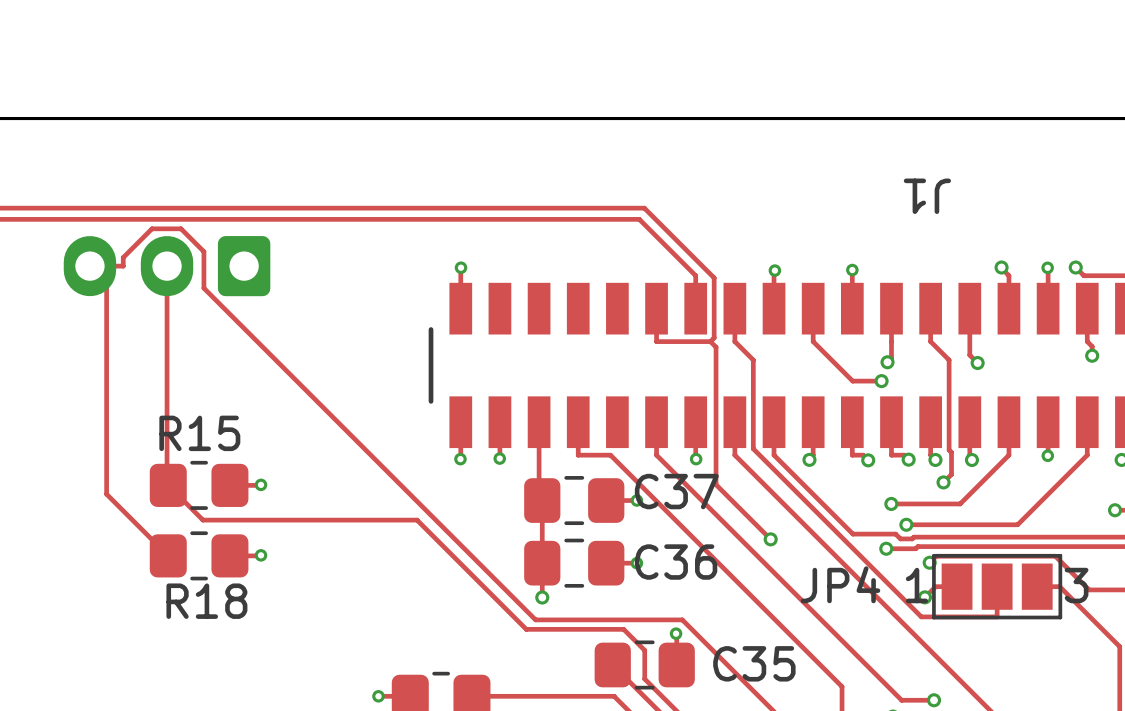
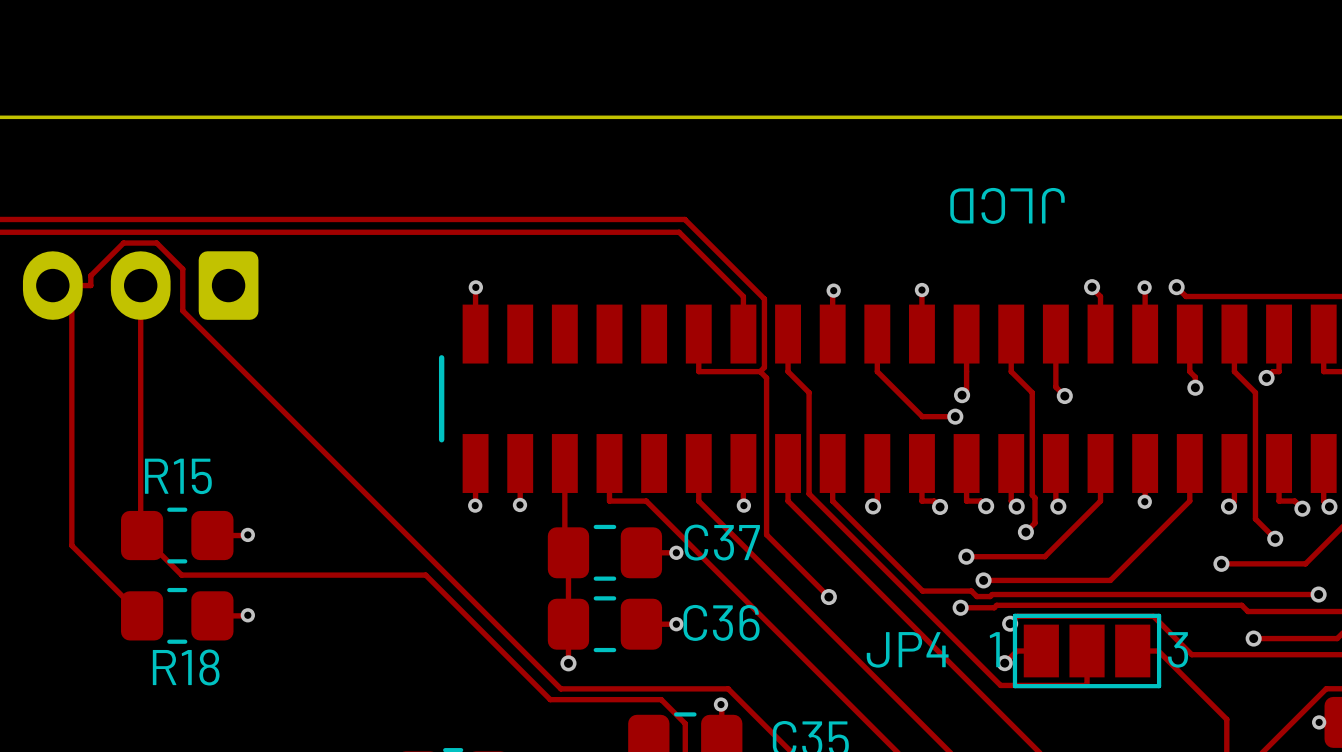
J1 name: J1 (927, 196) -> JLCD (1007, 205)

